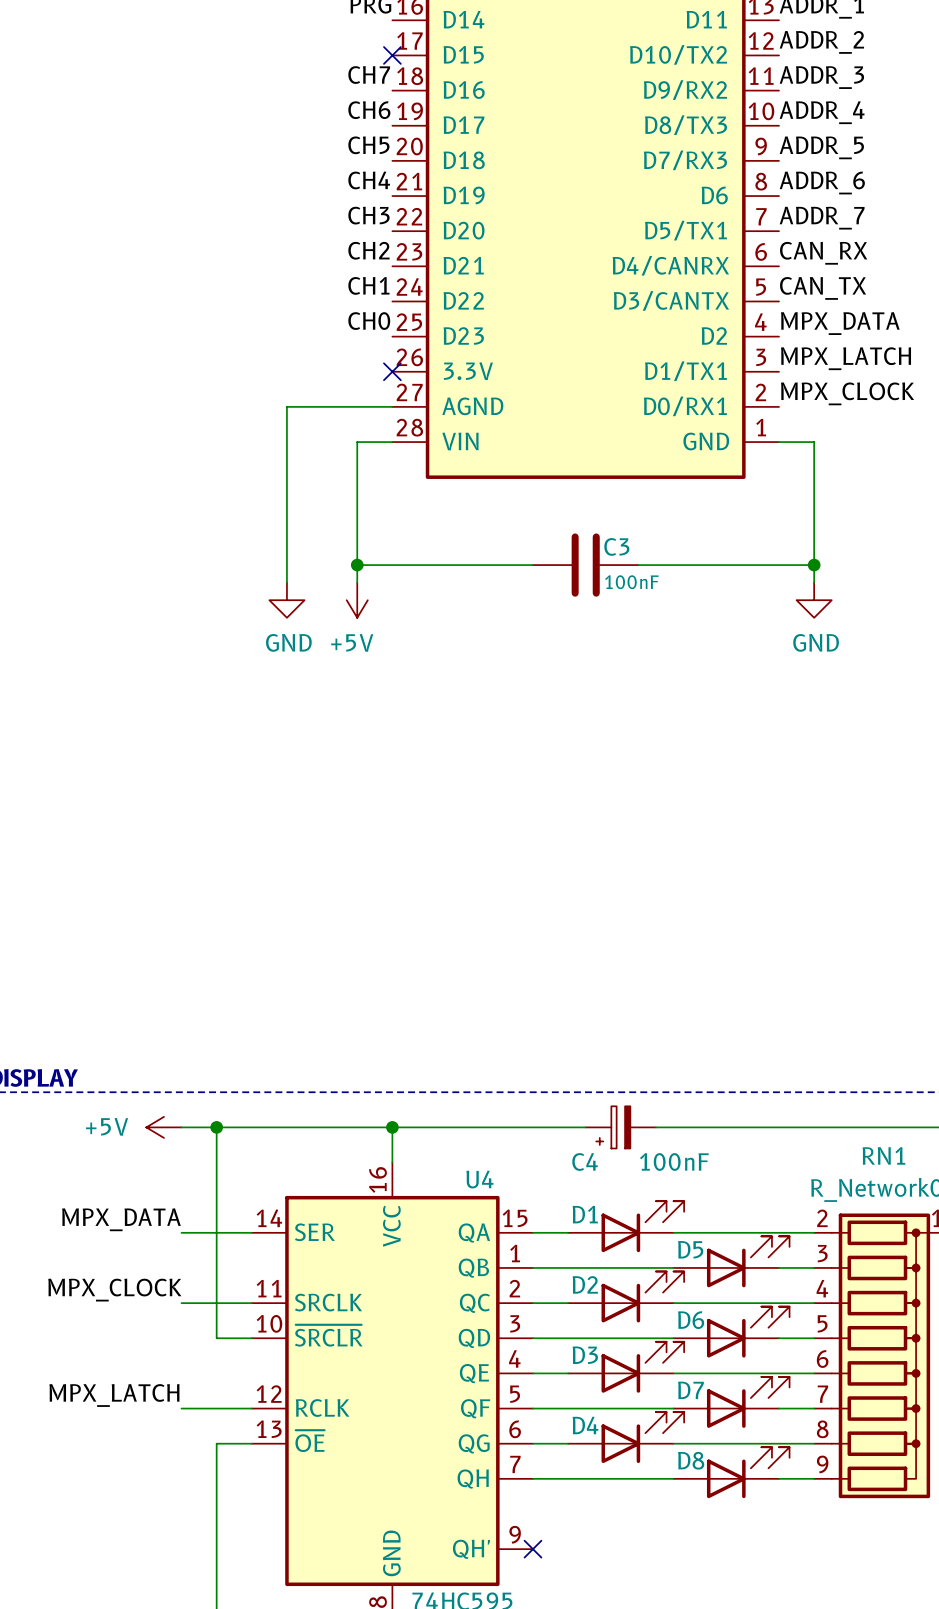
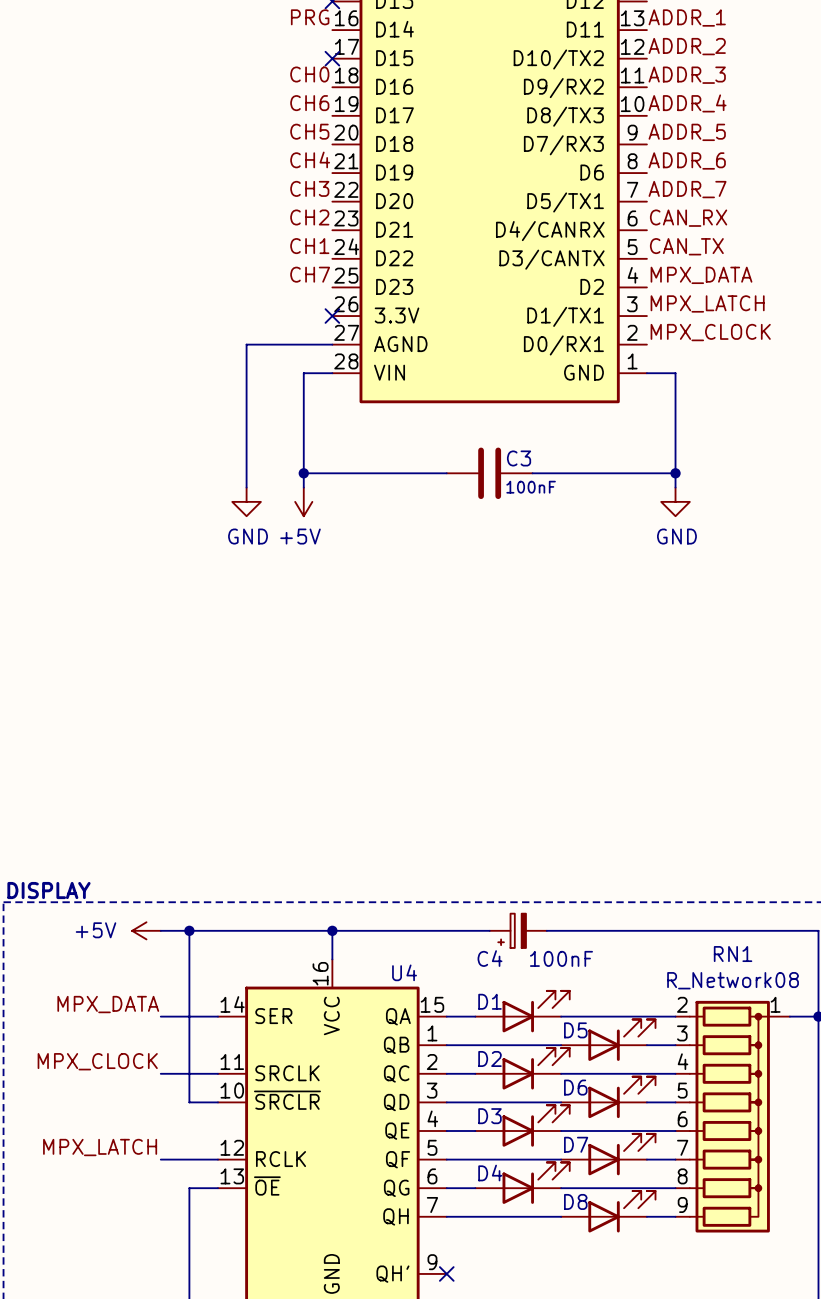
label: CH7 (369, 75) -> CH0 (309, 74)
label: CH0 (369, 321) -> CH7 (310, 274)

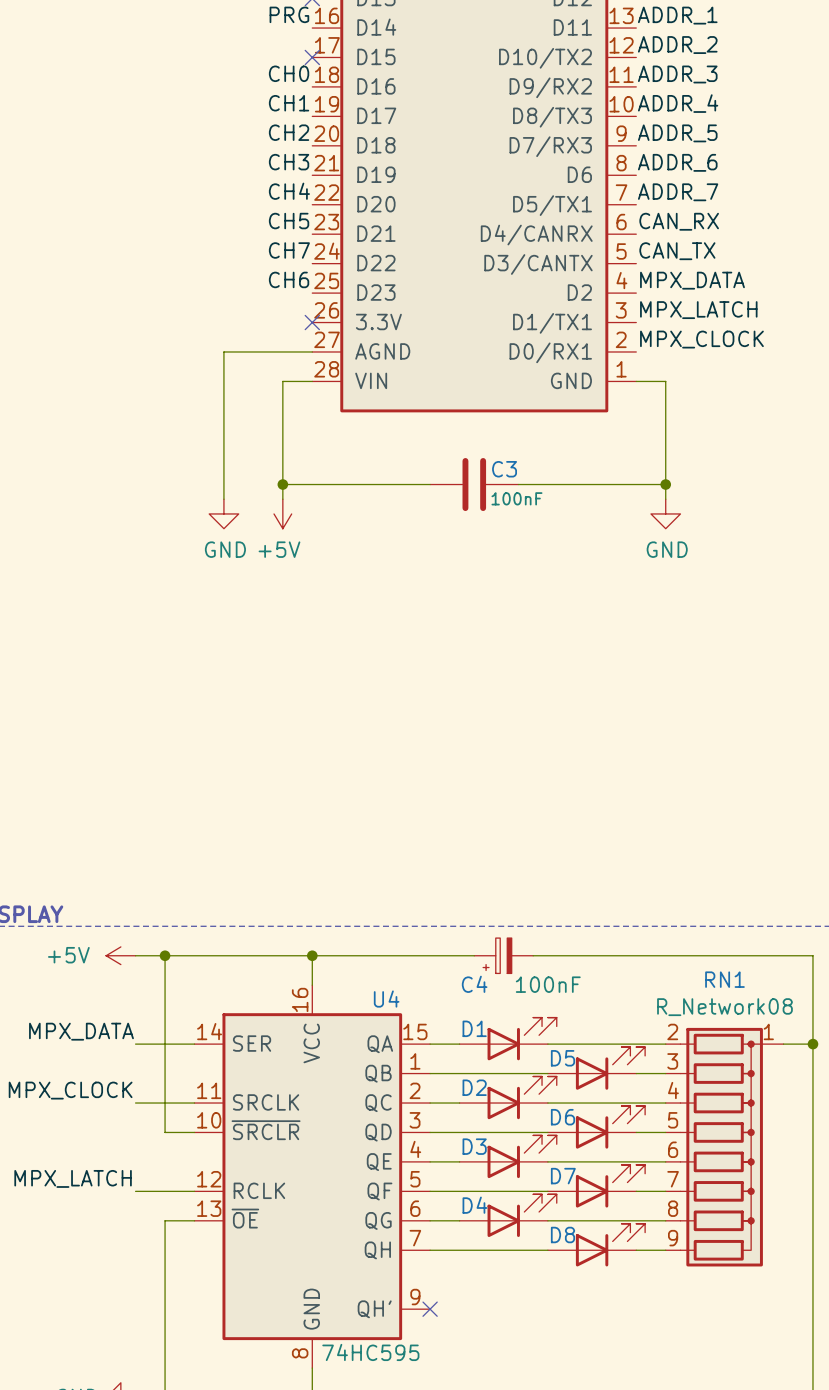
label: CH6 (309, 103) -> CH1 (289, 103)
label: CH5 (309, 131) -> CH2 (289, 132)
label: CH4 (310, 159) -> CH3 (289, 162)
label: CH3 (309, 188) -> CH4 (289, 191)
label: CH2 (309, 217) -> CH5 (289, 221)
label: CH1 (309, 246) -> CH7 (289, 250)
label: CH7 (310, 274) -> CH6 (289, 279)

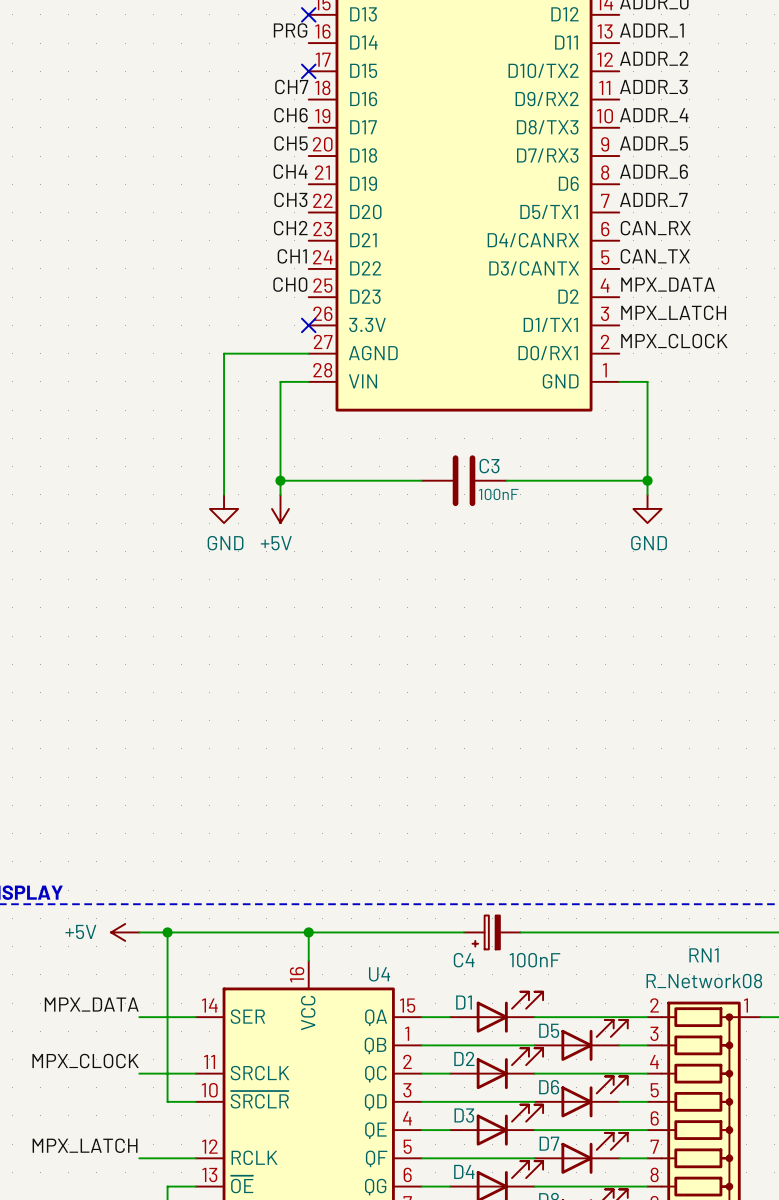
label: CH0 (289, 73) -> CH7 (291, 86)
label: CH1 (289, 103) -> CH6 (291, 115)
label: CH2 (289, 132) -> CH5 (291, 143)
label: CH3 (289, 162) -> CH4 (290, 171)
label: CH4 (289, 191) -> CH3 (290, 199)
label: CH5 (289, 221) -> CH2 (290, 228)
label: CH7 (289, 250) -> CH1 (292, 256)
label: CH6 (289, 279) -> CH0 (290, 284)

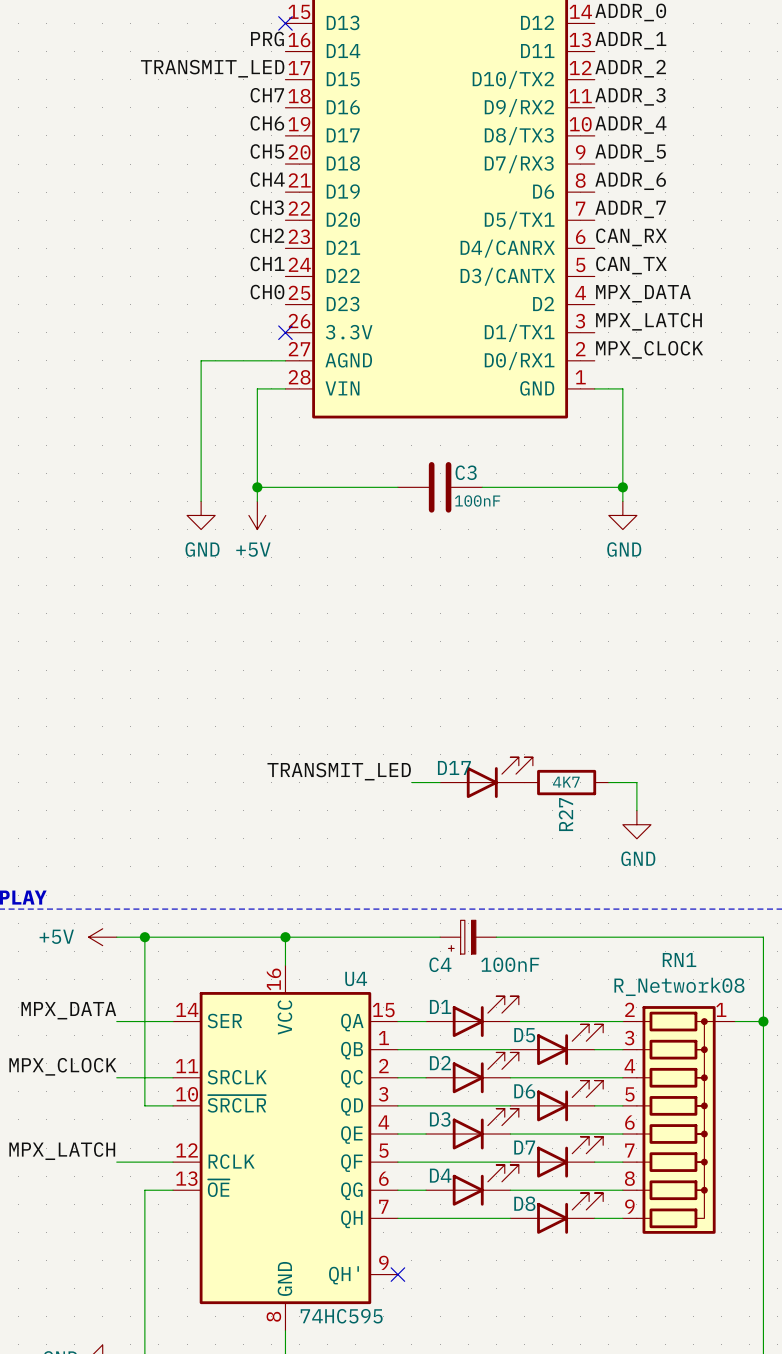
label: none -> TRANSMIT_LED (212, 68)
no-connect mark: (308, 71) -> none
label: none -> TRANSMIT_LED (339, 771)
D17: none -> (486, 777)
wire: none -> (411, 782) (440, 782)
R27: none -> 4K7 (566, 782)
wire: none -> (608, 782) (636, 782) (636, 810)
power symbol: none -> GND (636, 824)

